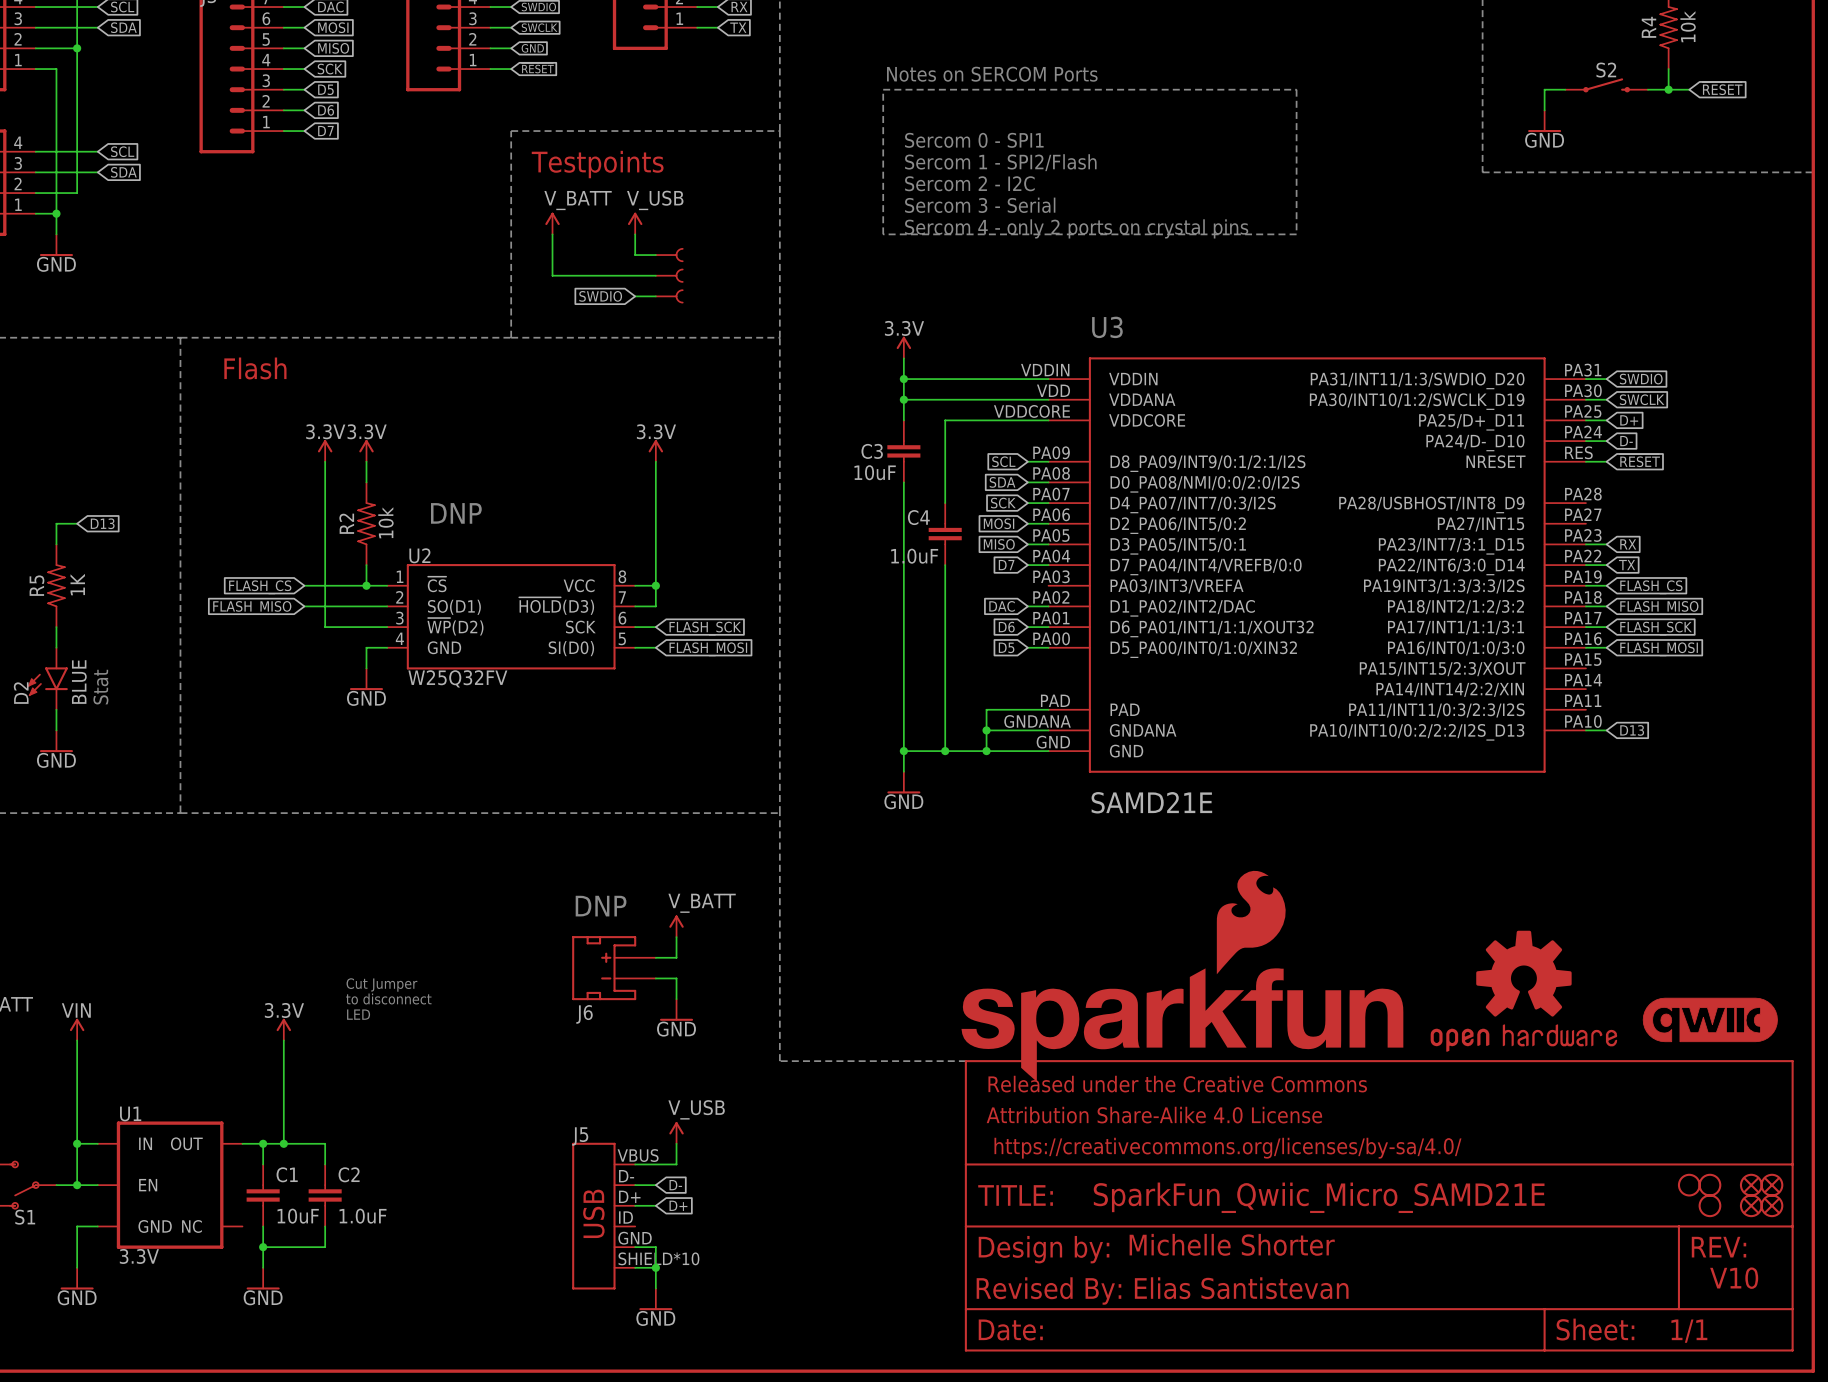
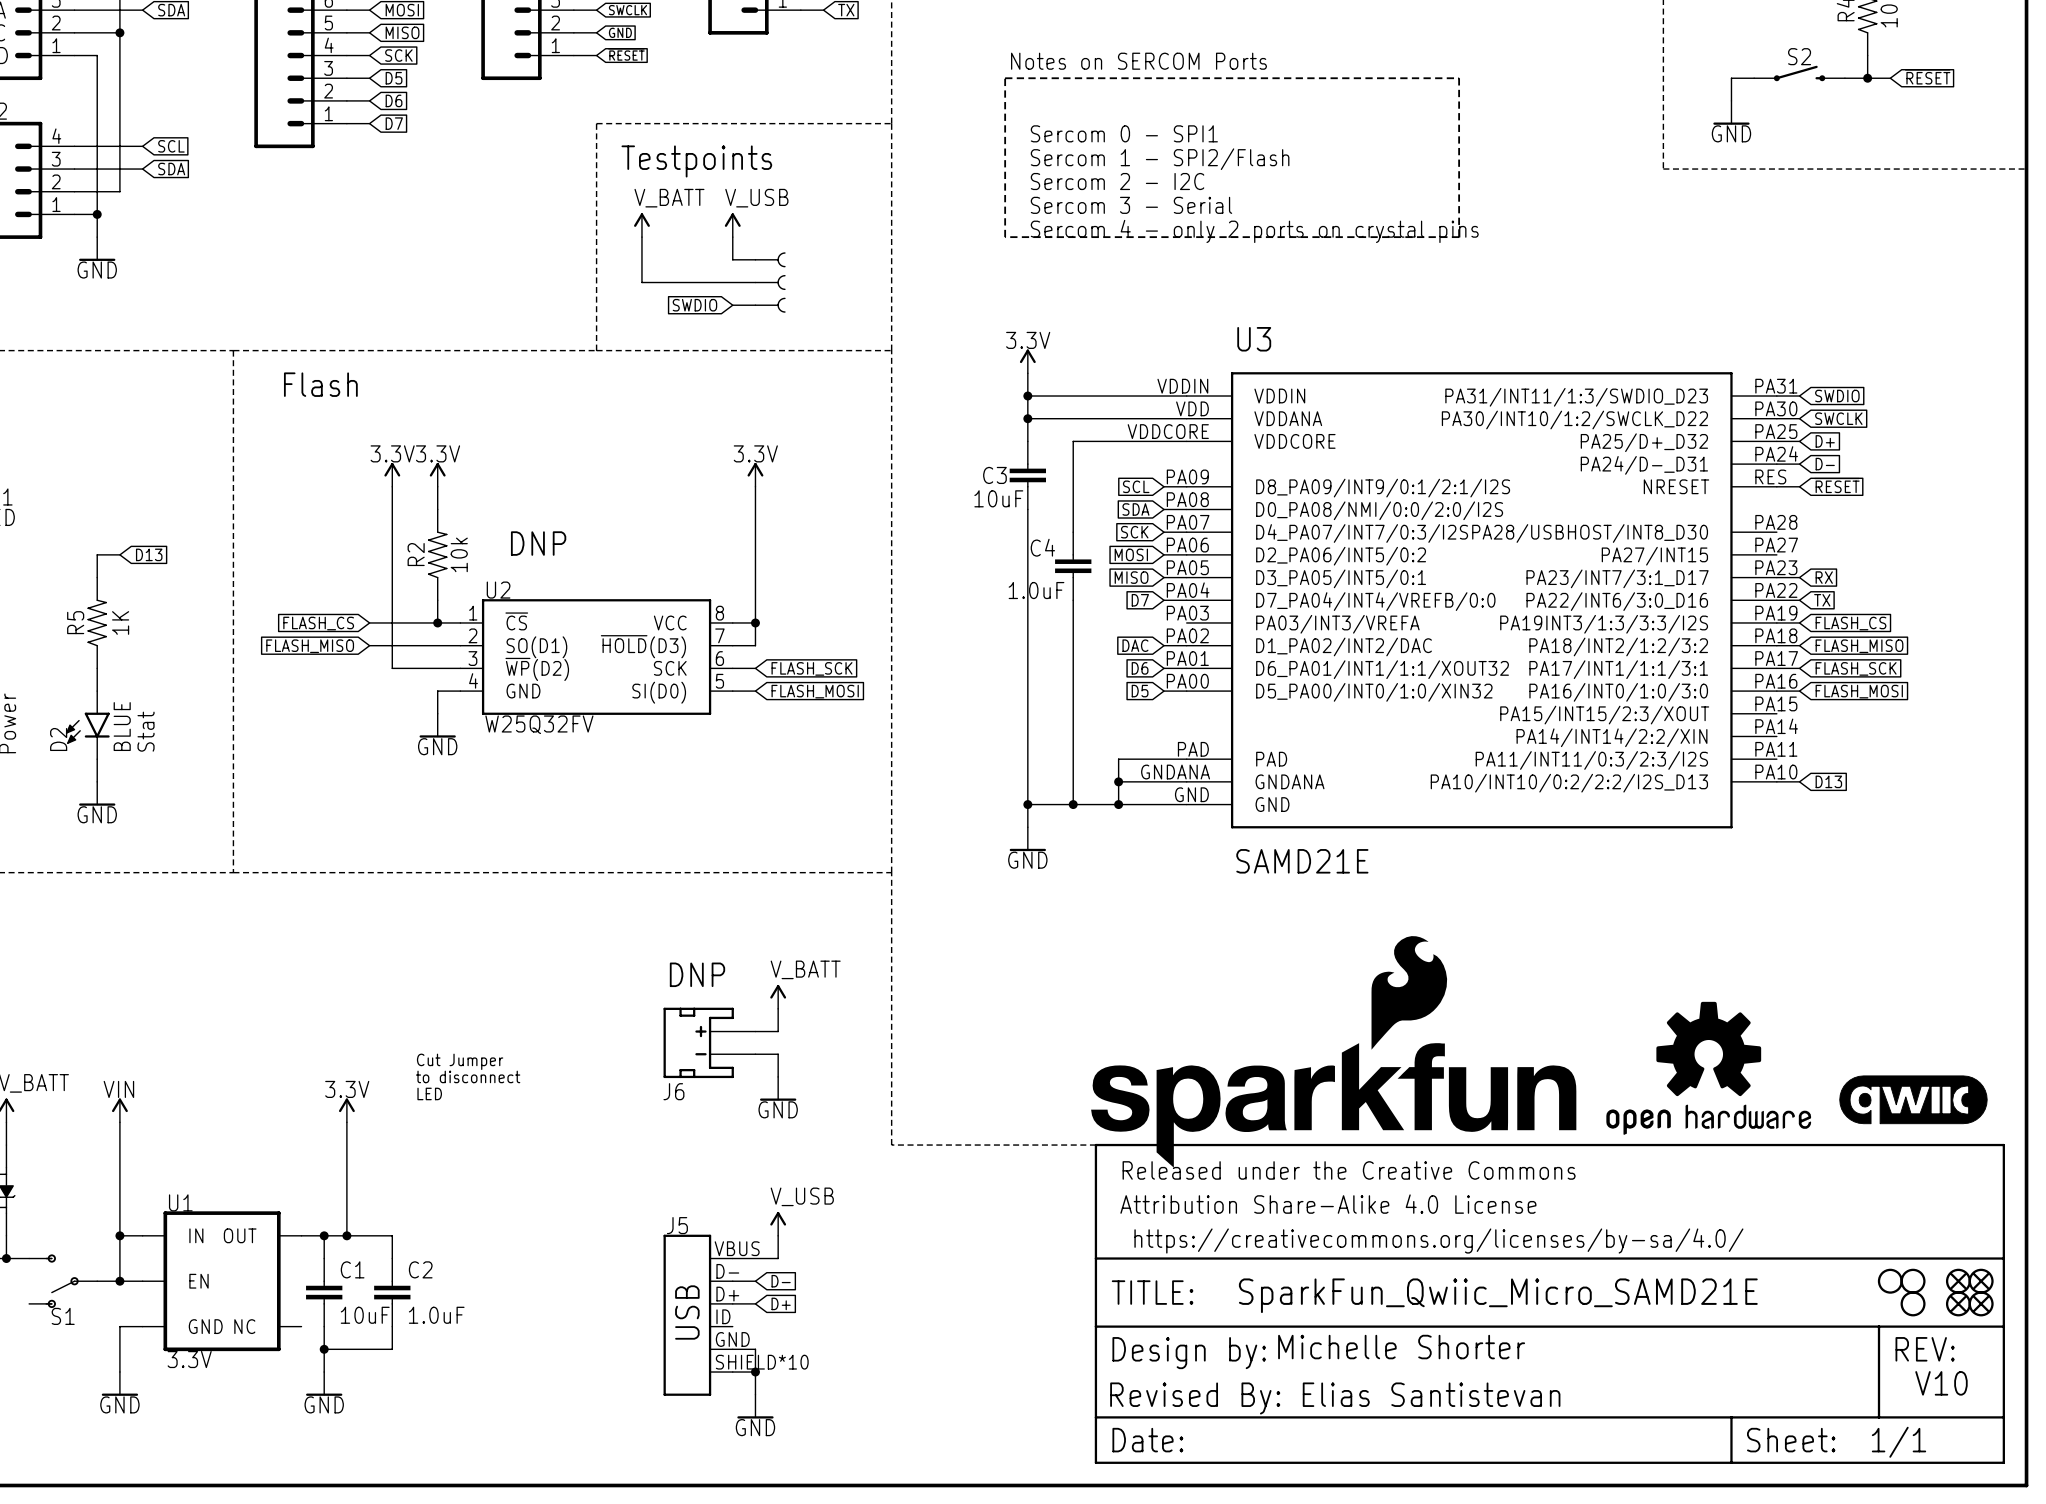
part pin name: PA31/INT11/1:3/SWDIO_D20 (1417, 380) -> PA31/INT11/1:3/SWDIO_D23 (1576, 397)
part pin name: PA30/INT10/1:2/SWCLK_D19 (1417, 401) -> PA30/INT10/1:2/SWCLK_D22 (1574, 420)
part pin name: PA25/D+_D11 (1471, 422) -> PA25/D+_D32 (1644, 442)
part pin name: PA24/D-_D10 (1475, 442) -> PA24/D-_D31 (1644, 465)
part pin name: PA28/USBHOST/INT8_D9 (1431, 504) -> PA28/USBHOST/INT8_D30 (1590, 533)
part pin name: PA23/INT7/3:1_D15 (1451, 546) -> PA23/INT7/3:1_D17 (1617, 578)
part pin name: PA22/INT6/3:0_D14 (1451, 566) -> PA22/INT6/3:0_D16 (1617, 601)

